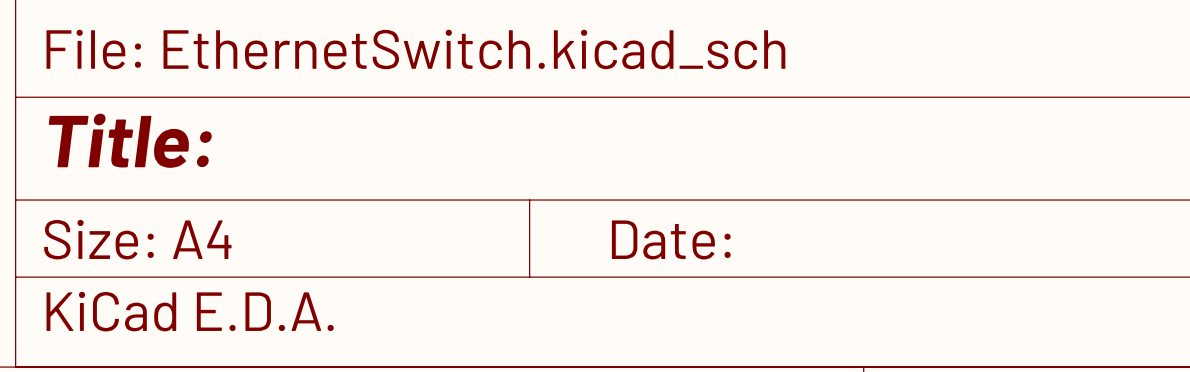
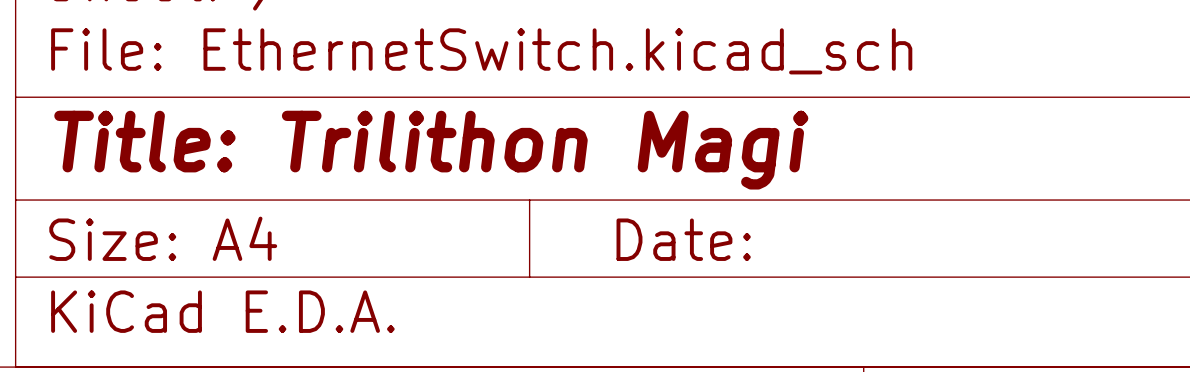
title block: Title: (130, 140) -> Title: Trilithon Magi (431, 150)

